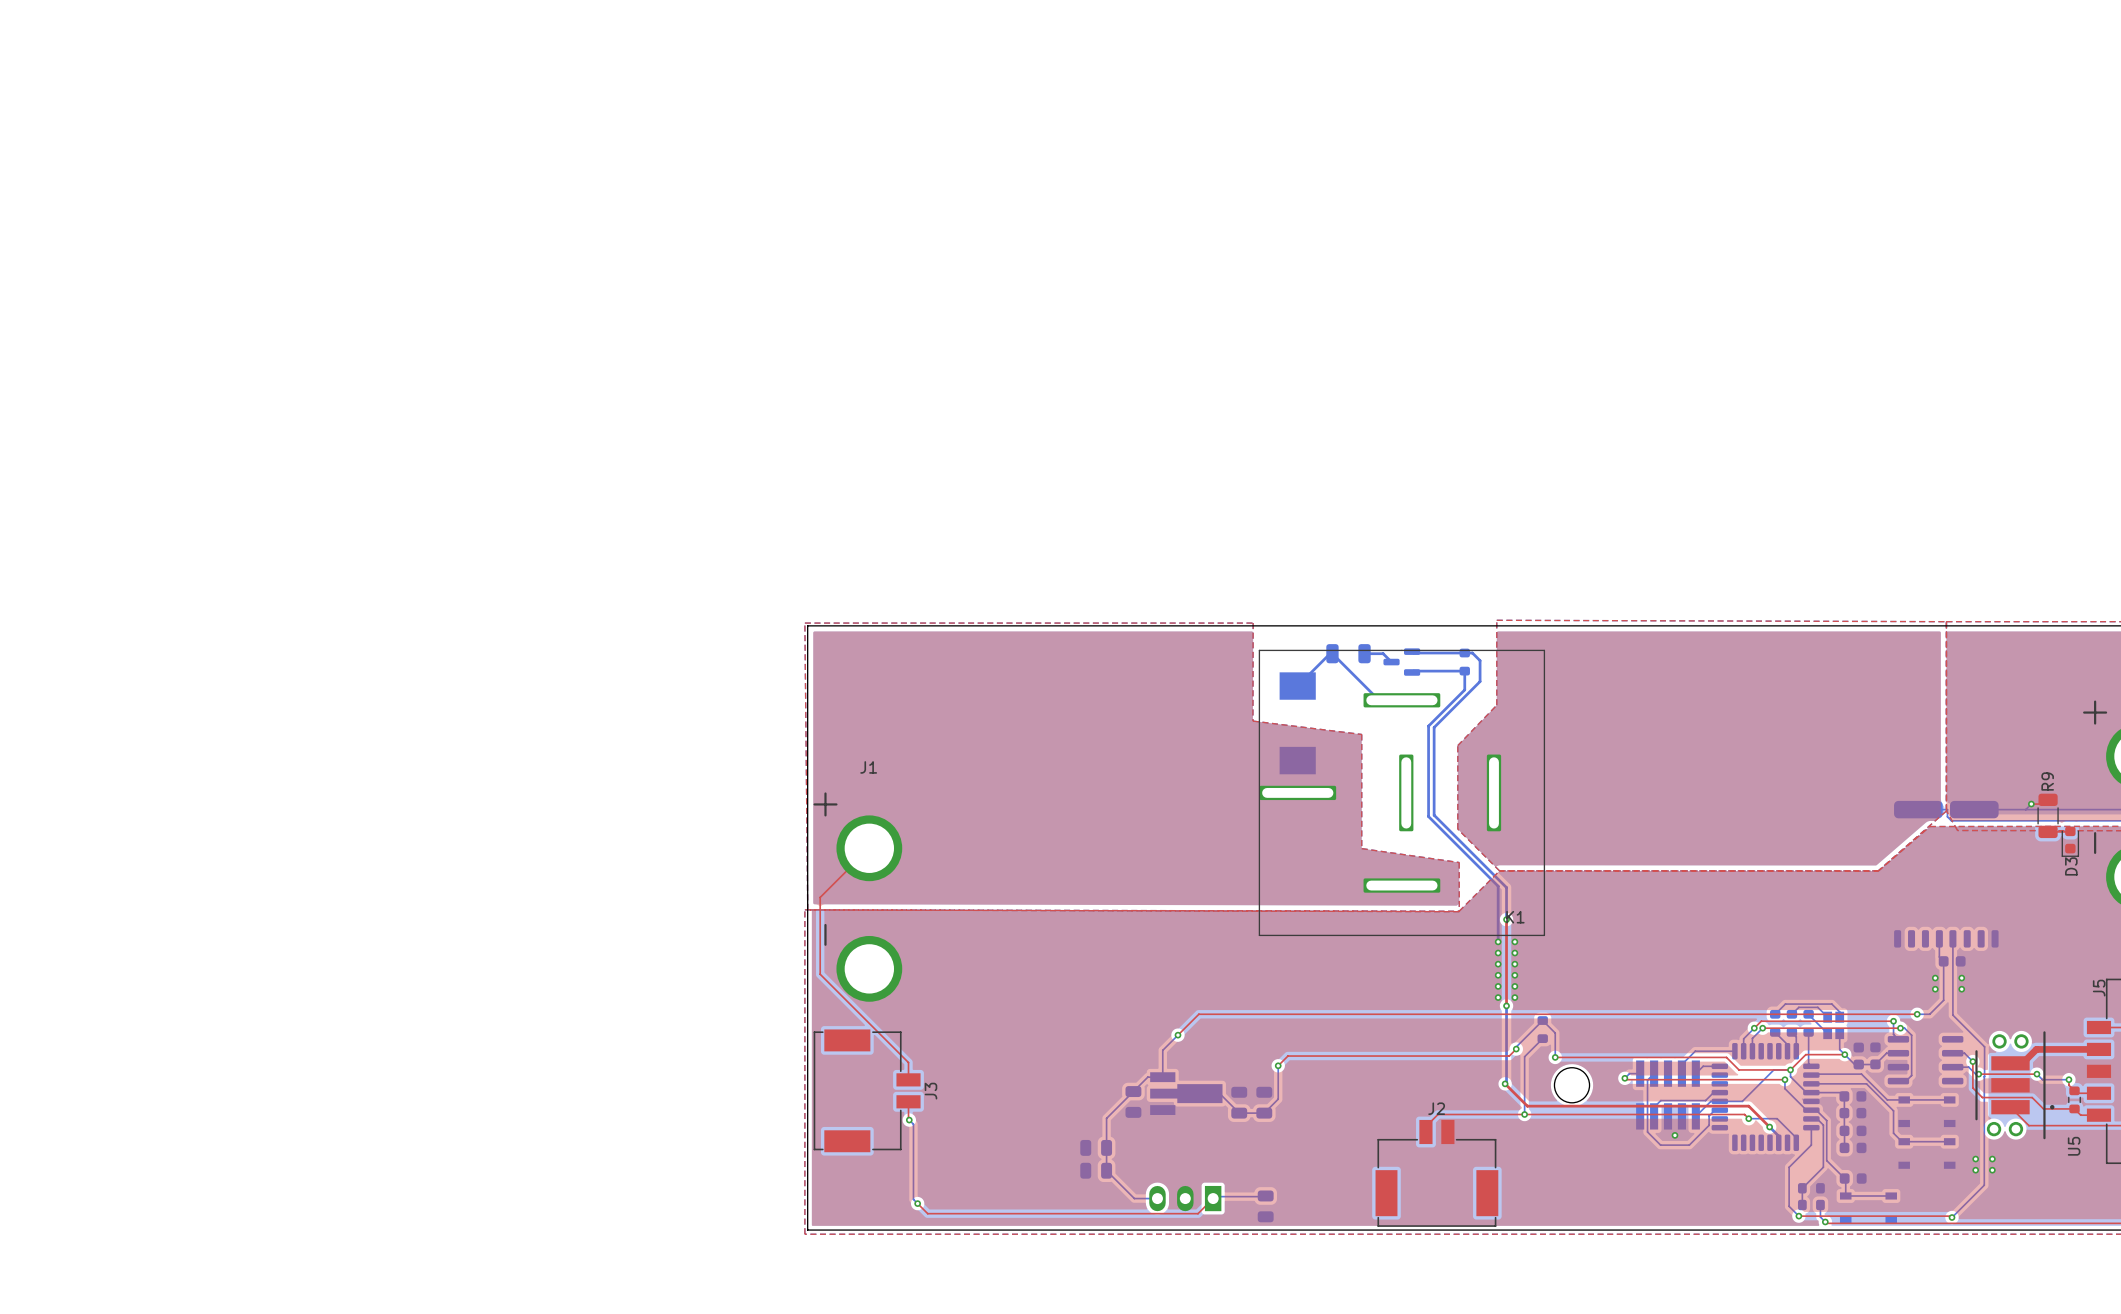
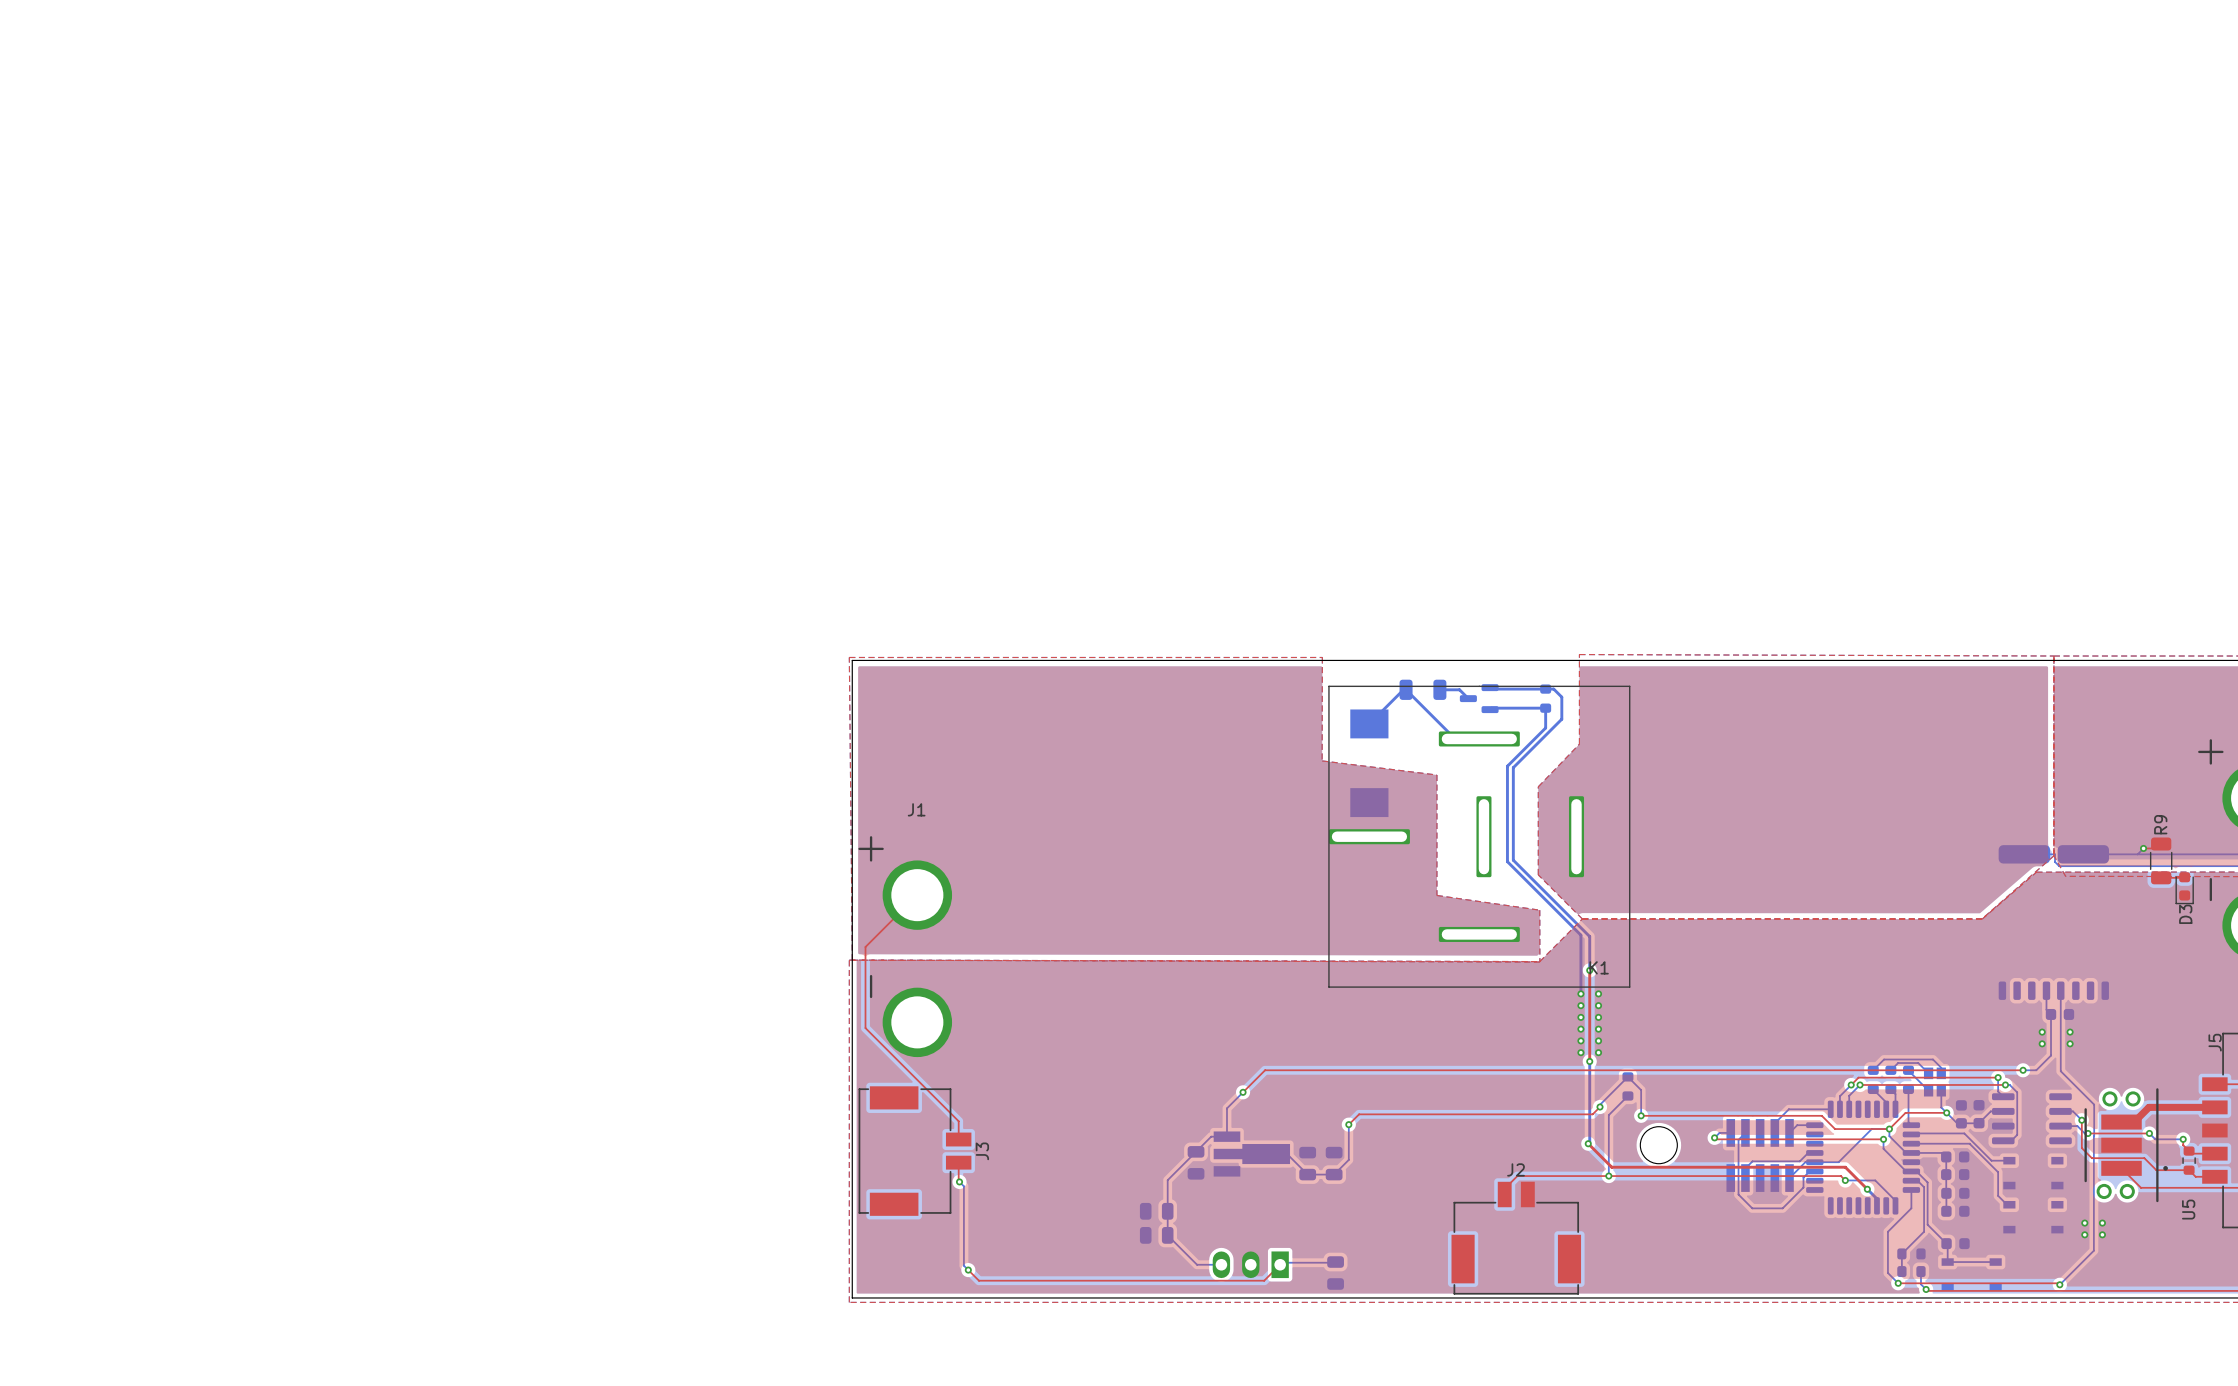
bottom track: (1904, 1099) (1949, 1099) -> none
via: (1674, 1135) -> none
bottom track: (1904, 1141) (1949, 1141) -> none

